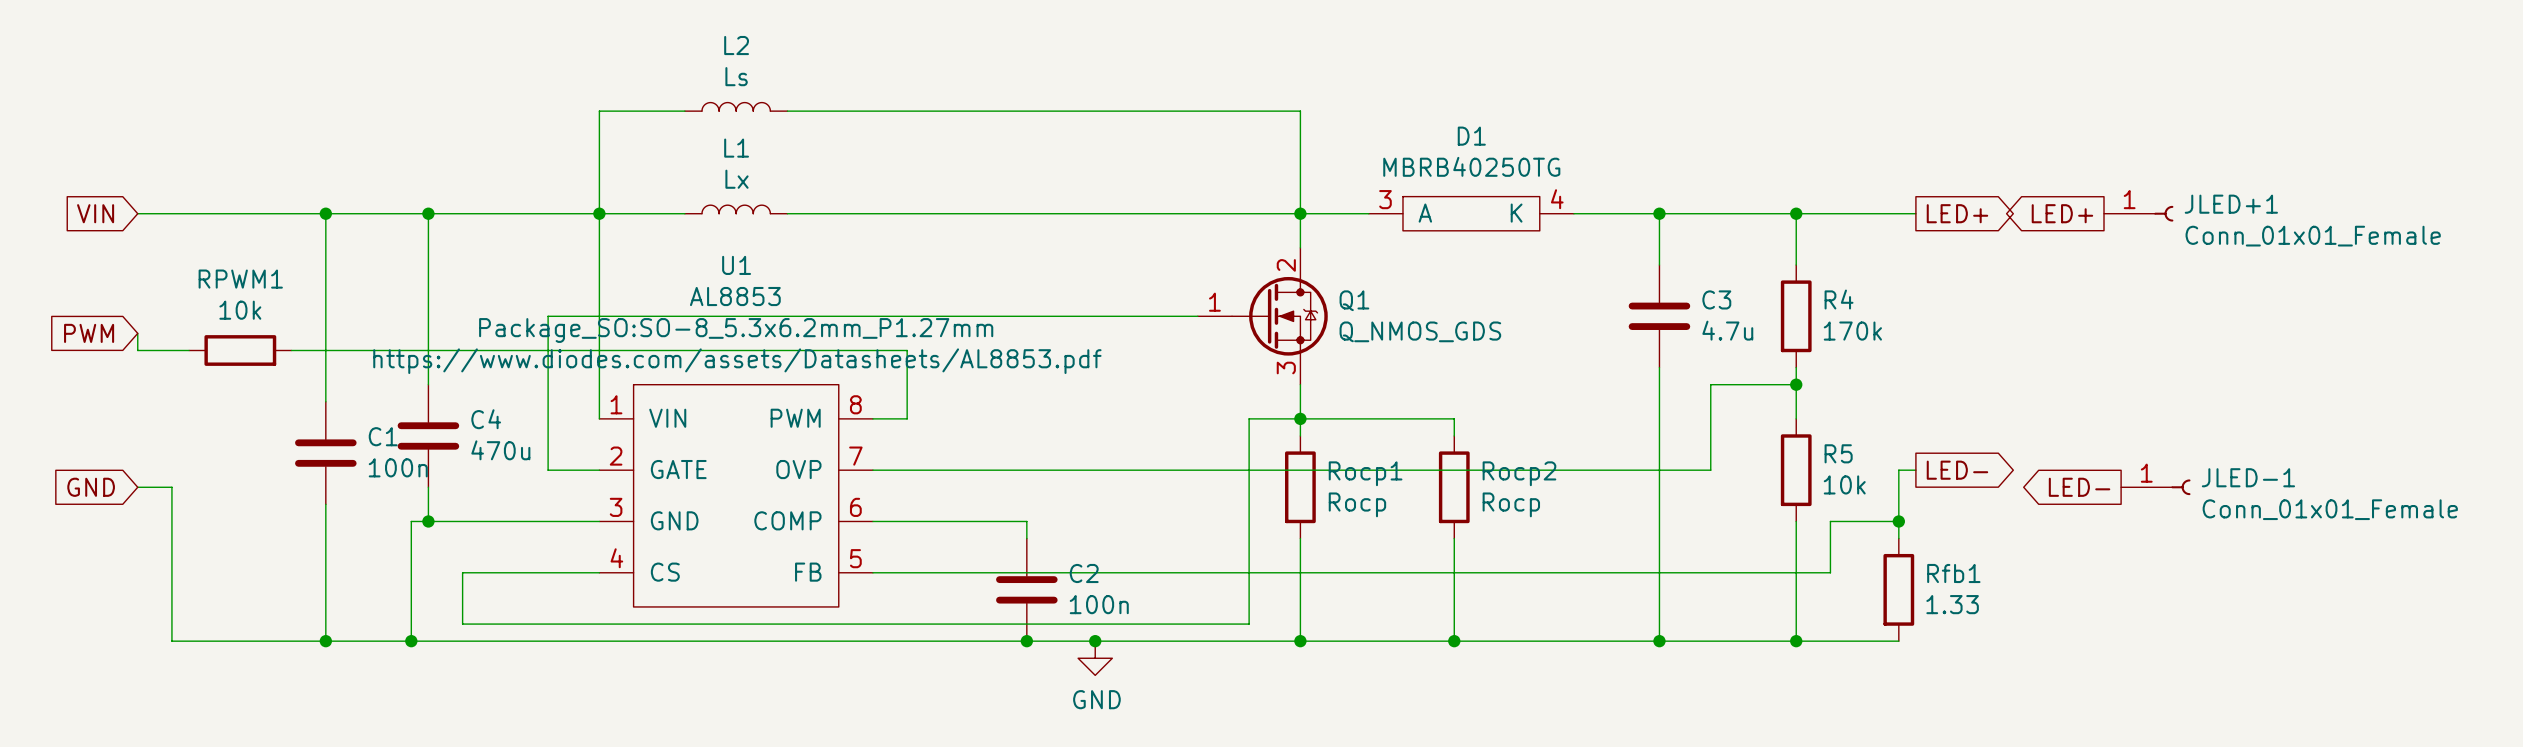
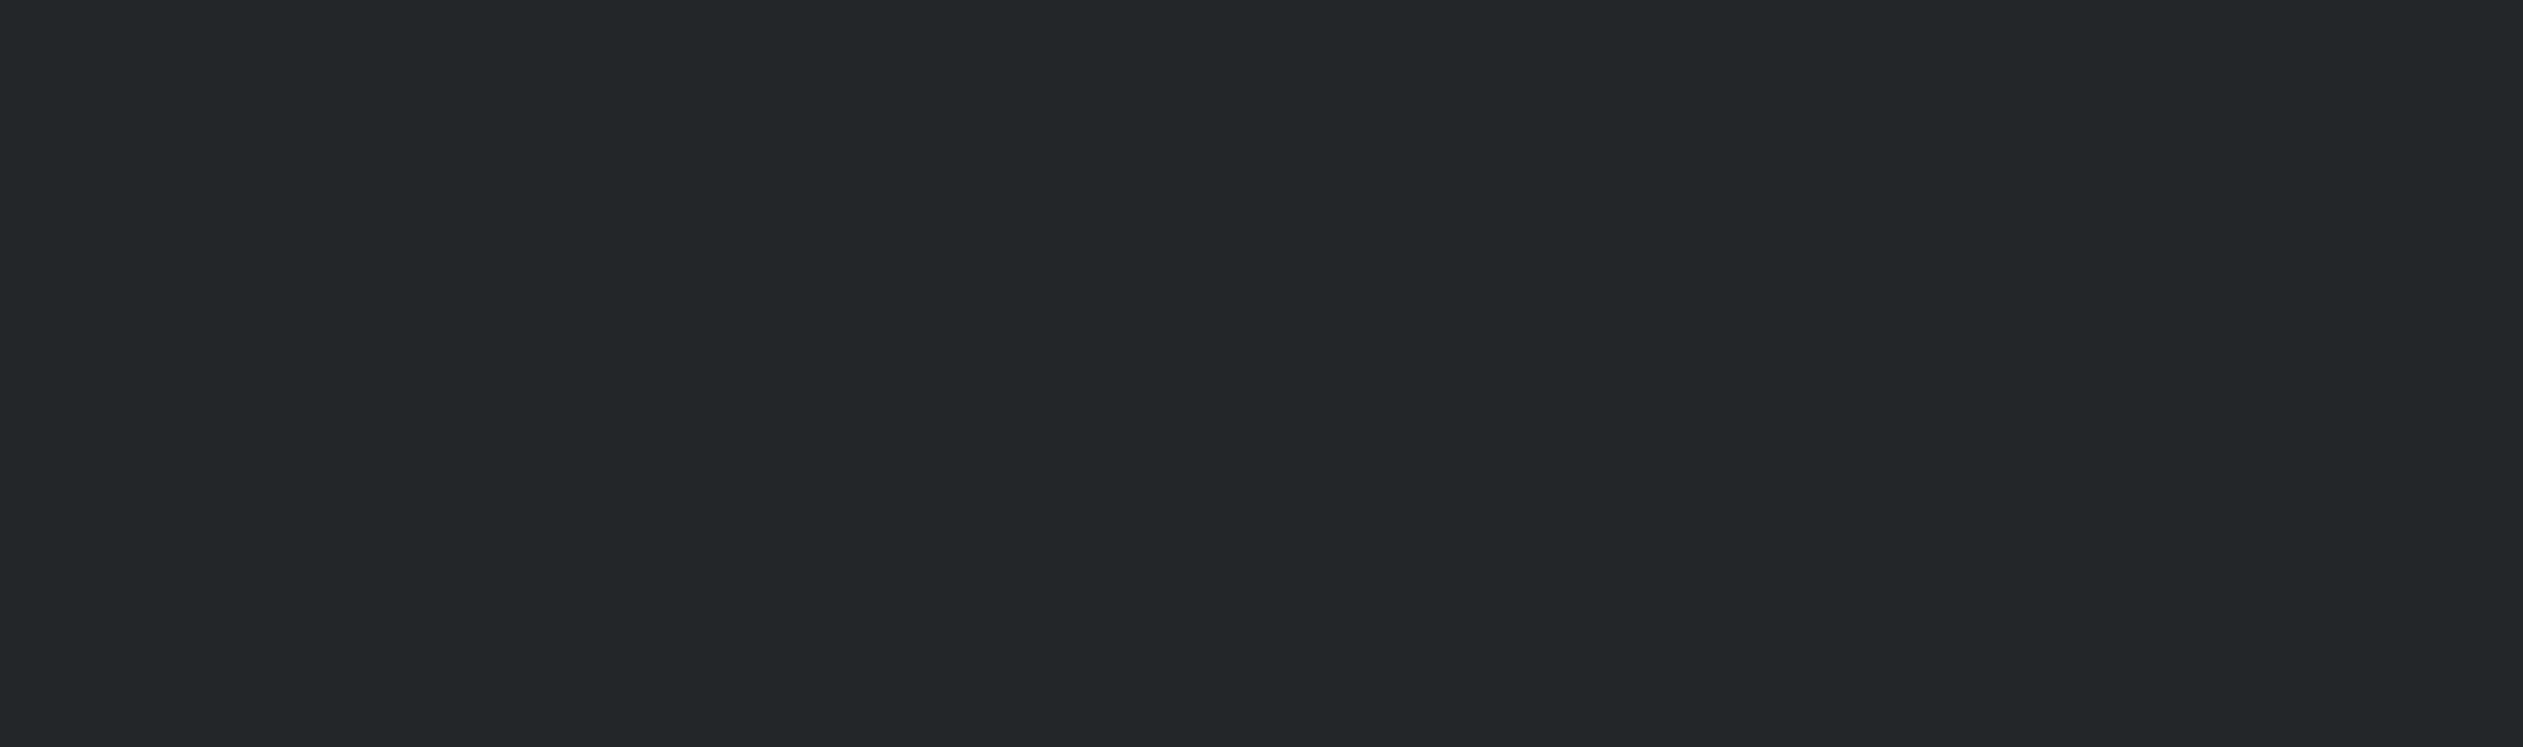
L2: Ls (736, 106) -> none
wire: (684, 111) (599, 111) (599, 418) -> none
wire: (787, 111) (1300, 111) (1300, 247) -> none
L1: Lx (736, 209) -> none
global label: VIN (95, 213) -> none
wire: (137, 213) (684, 213) -> none
wire: (325, 213) (325, 401) -> none
junction: (325, 213) -> none
wire: (428, 213) (428, 384) -> none
junction: (428, 213) -> none
junction: (599, 213) -> none
wire: (787, 213) (1368, 213) -> none
junction: (1300, 213) -> none
D1: MBRB40250TG (1471, 213) -> none
wire: (1573, 213) (1915, 213) -> none
wire: (1659, 213) (1659, 265) -> none
junction: (1659, 213) -> none
wire: (1796, 213) (1796, 265) -> none
junction: (1796, 213) -> none
global label: LED+ (1957, 213) -> none
global label: LED+ (2062, 213) -> none
JLED+1: Conn_01x01_Female (2138, 213) -> none
wire: (1197, 316) (548, 316) (548, 470) (599, 470) -> none
Q1: Q_NMOS_GDS (1262, 316) -> none
C3: 4.7u (1659, 316) -> none
R4: 170k (1796, 316) -> none
global label: PWM (89, 333) -> none
wire: (137, 333) (137, 350) (189, 350) -> none
RPWM1: 10k (240, 350) -> none
wire: (291, 350) (907, 350) (907, 418) (872, 418) -> none
wire: (1659, 367) (1659, 641) -> none
wire: (1796, 367) (1796, 418) -> none
wire: (1300, 384) (1300, 435) -> none
wire: (1796, 384) (1710, 384) (1710, 470) (872, 470) -> none
junction: (1796, 384) -> none
junction: (1300, 418) -> none
C4: 470u (428, 435) -> none
wire: (1454, 435) (1454, 418) (1249, 418) (1249, 624) (462, 624) (462, 572) (599, 572) -> none
C1: 100n (325, 453) -> none
R5: 10k (1796, 470) -> none
wire: (1915, 470) (1898, 470) (1898, 538) -> none
global label: LED- (1957, 470) -> none
global label: GND (91, 487) -> none
wire: (137, 487) (171, 487) (171, 641) (1898, 641) -> none
wire: (428, 487) (428, 521) -> none
Rocp1: Rocp (1300, 487) -> none
Rocp2: Rocp (1454, 487) -> none
global label: LED- (2079, 487) -> none
JLED-1: Conn_01x01_Female (2155, 487) -> none
U1: AL8853 (736, 495) -> none
wire: (325, 504) (325, 641) -> none
junction: (428, 521) -> none
wire: (599, 521) (411, 521) (411, 641) -> none
wire: (872, 521) (1026, 521) (1026, 538) -> none
wire: (1796, 521) (1796, 641) -> none
wire: (1898, 521) (1830, 521) (1830, 572) (872, 572) -> none
junction: (1898, 521) -> none
wire: (1300, 538) (1300, 641) -> none
wire: (1454, 538) (1454, 641) -> none
C2: 100n (1026, 589) -> none
Rfb1: 1.33 (1898, 589) -> none
junction: (325, 641) -> none
junction: (411, 641) -> none
junction: (1026, 641) -> none
junction: (1095, 641) -> none
junction: (1300, 641) -> none
junction: (1454, 641) -> none
junction: (1659, 641) -> none
junction: (1796, 641) -> none
power symbol: GND (1095, 658) -> none

